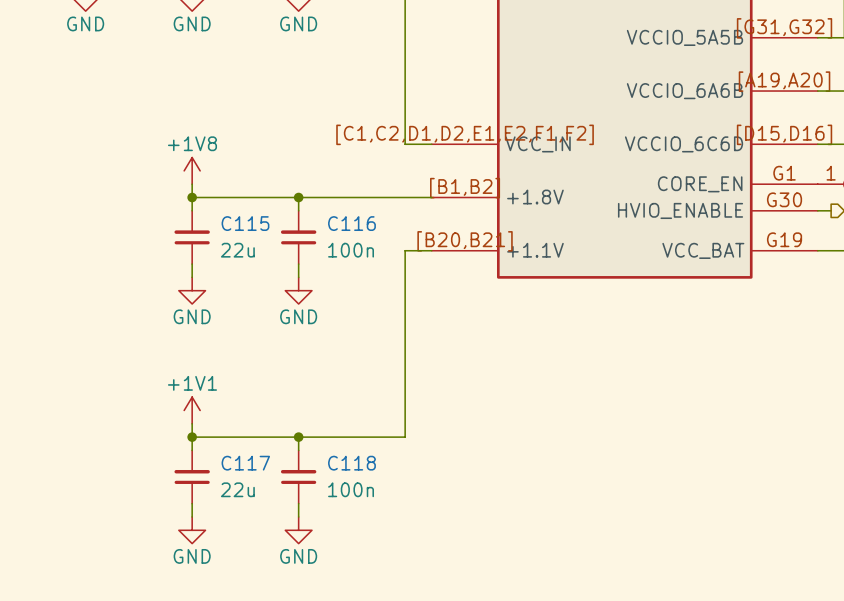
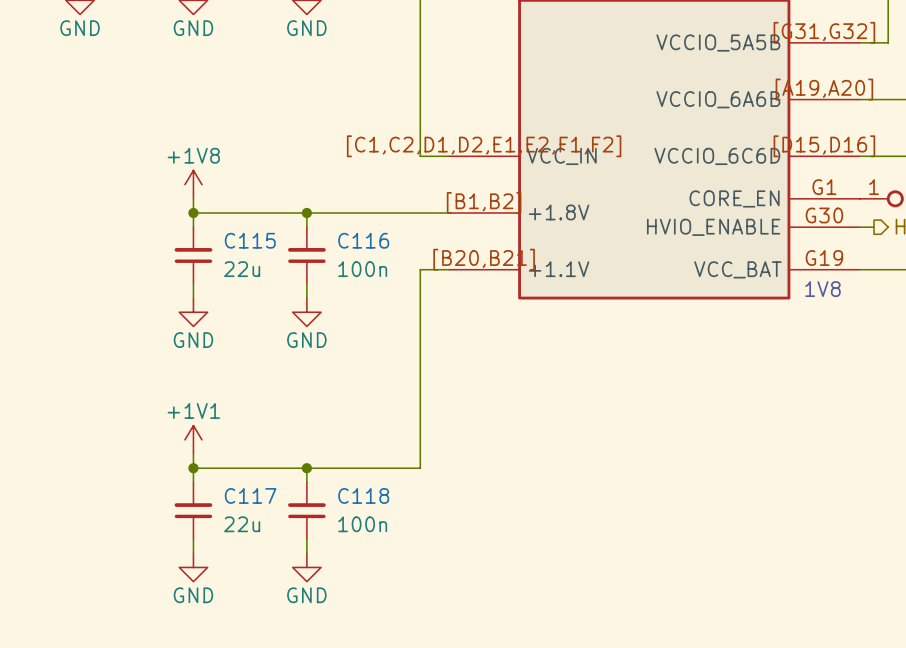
text: none -> 1V8 (822, 289)

